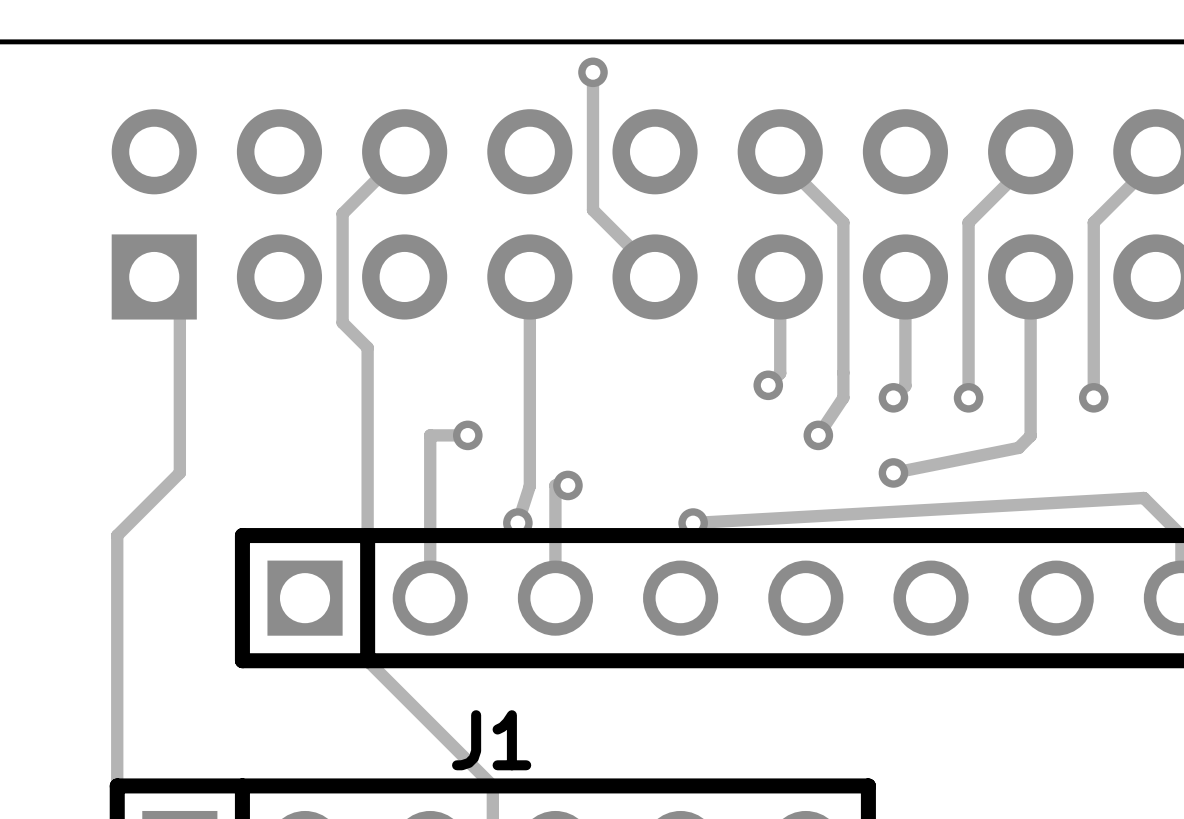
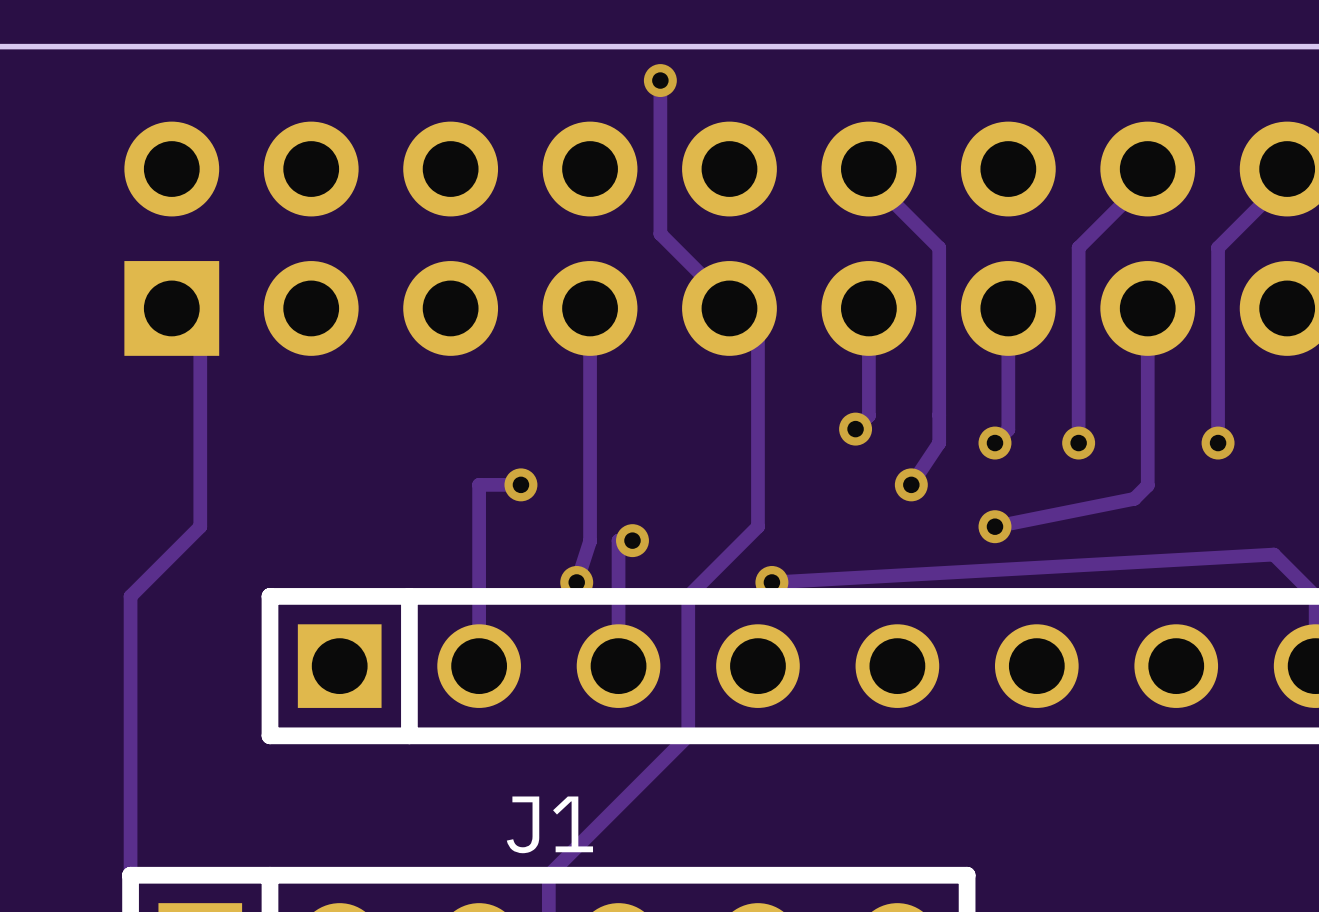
track: (404, 151) (342, 213) (342, 322) (367, 347) (367, 660) (492, 785) -> (729, 308) (757, 317) (757, 526) (688, 596) (688, 735) (548, 875)

